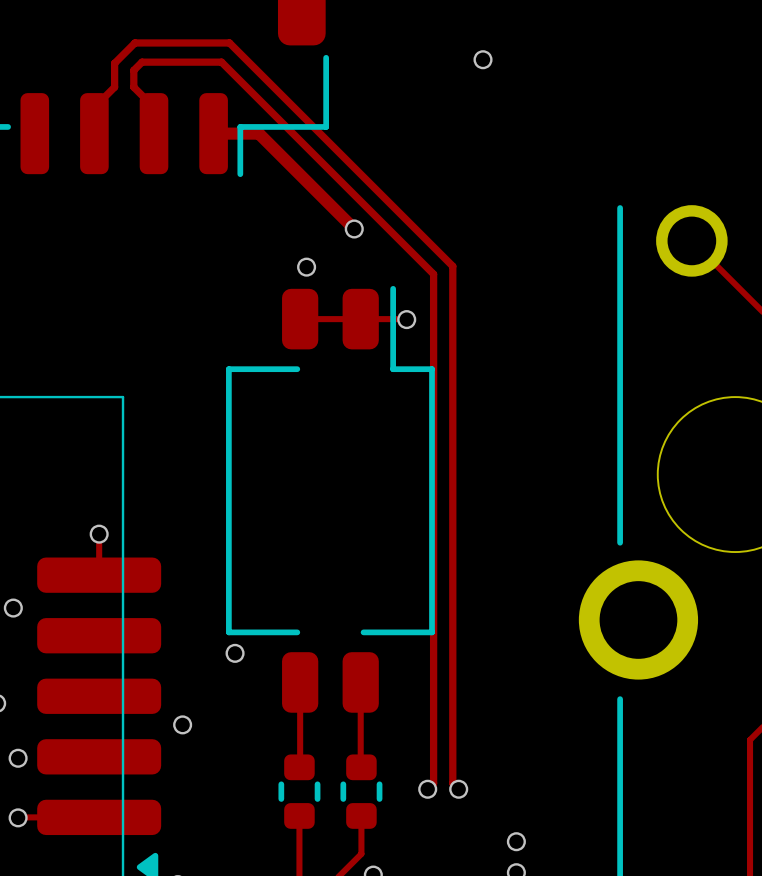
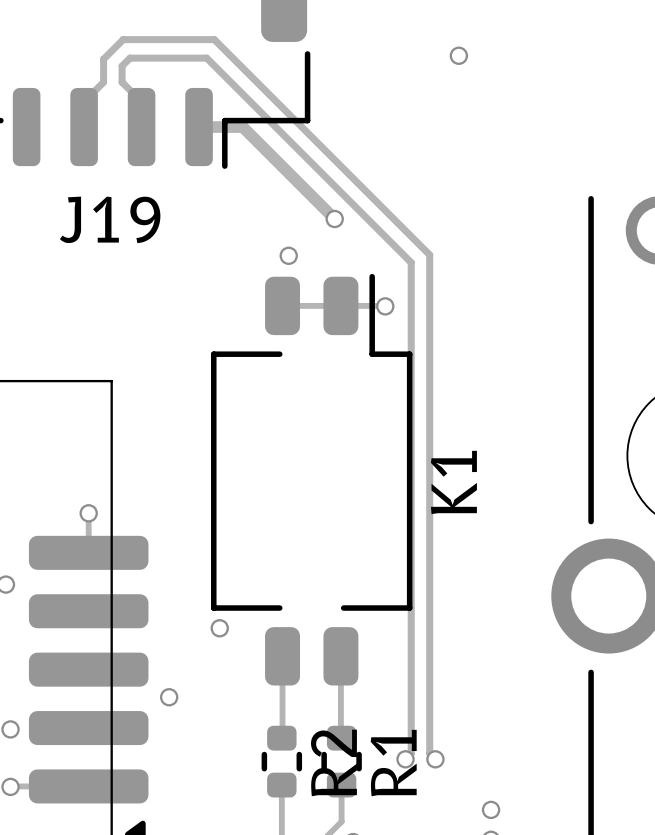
J19 name: none -> J19 (110, 219)
K1 name: none -> K1 (453, 482)
R2 name: none -> R2 (333, 762)
R1 name: none -> R1 (393, 763)

